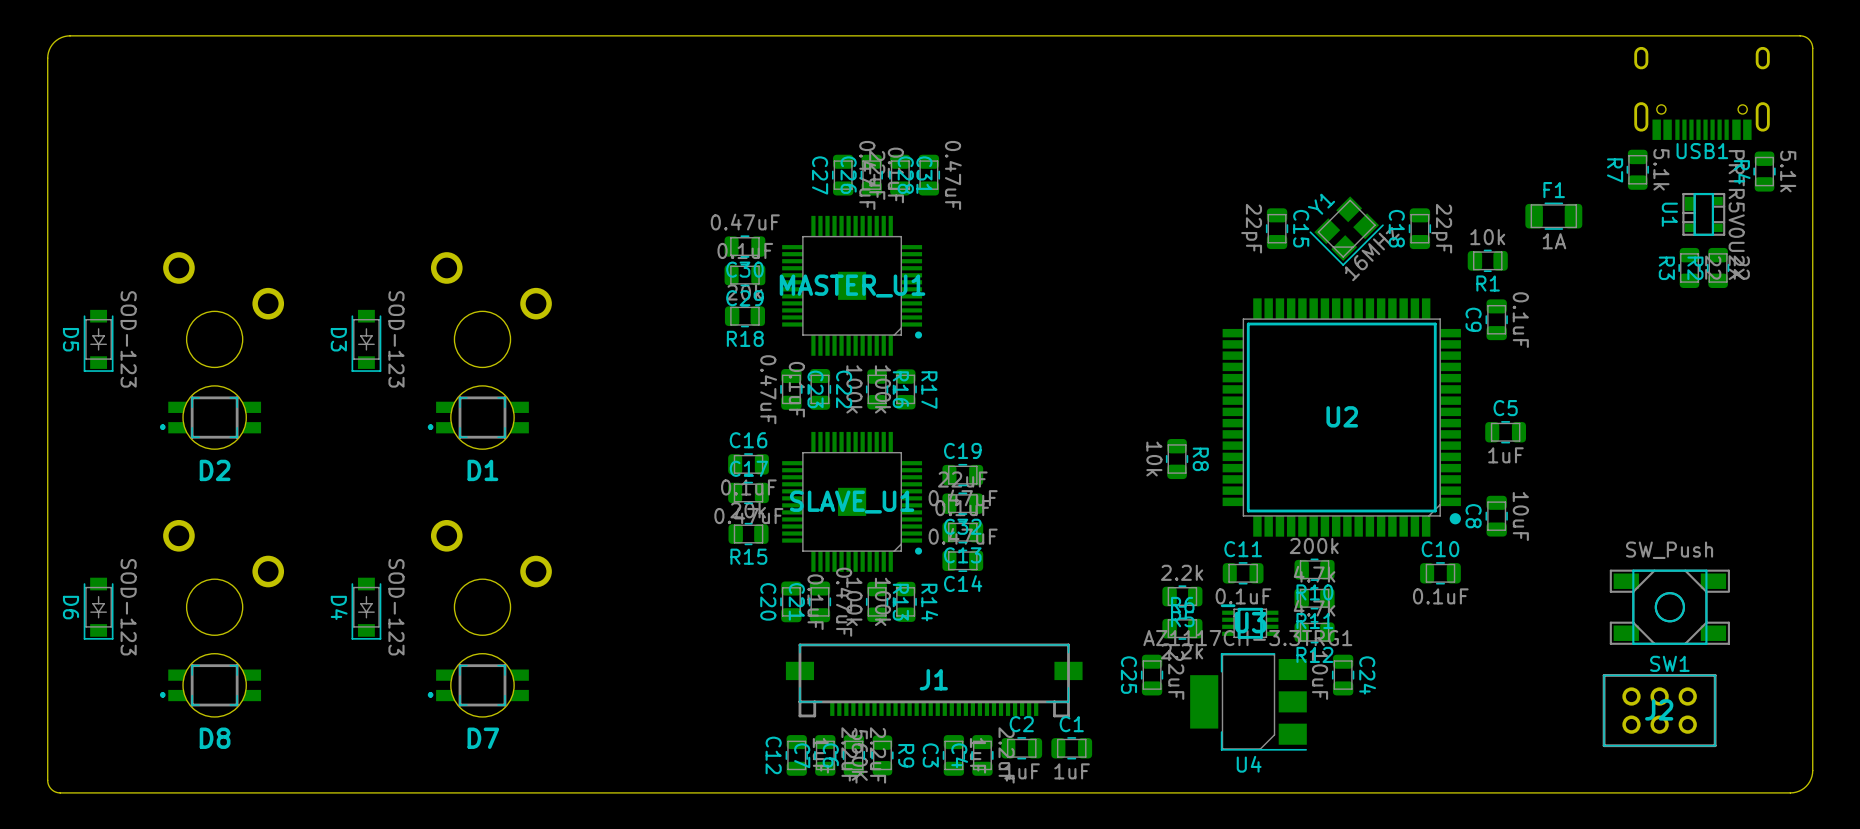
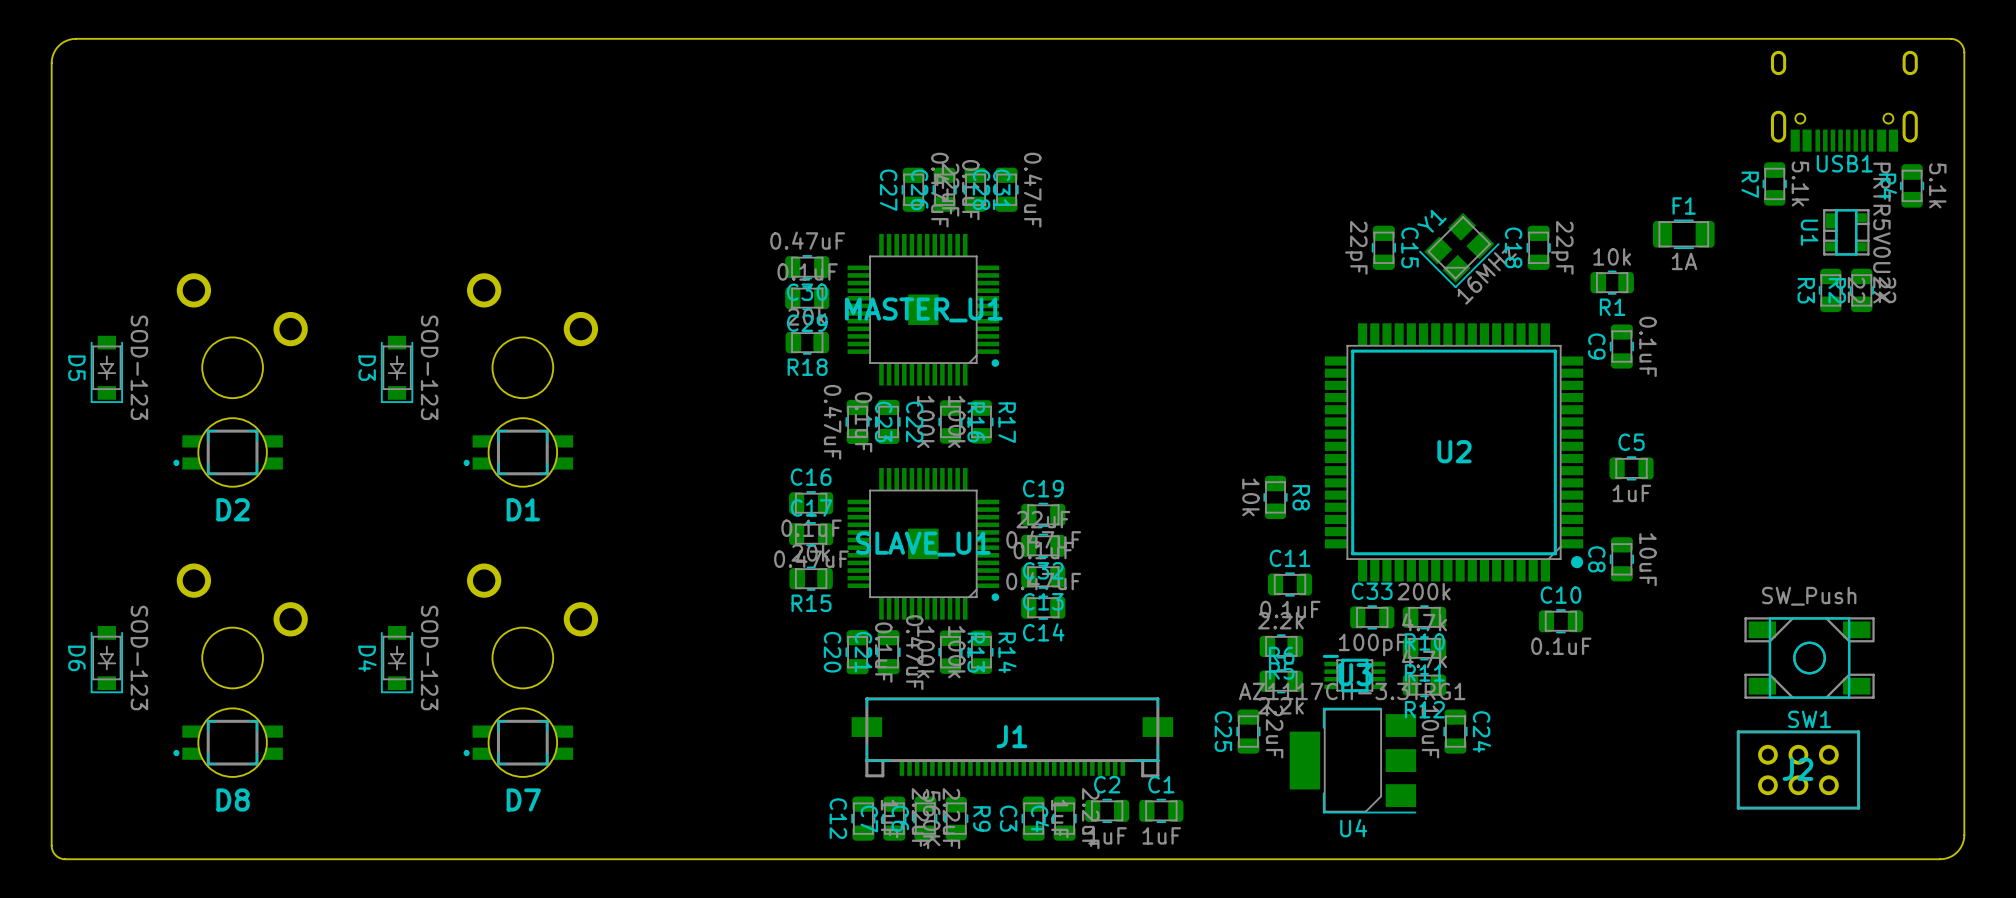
C33: none -> 100pF (1372, 617)
C11 position: (1243, 573) -> (1289, 584)

